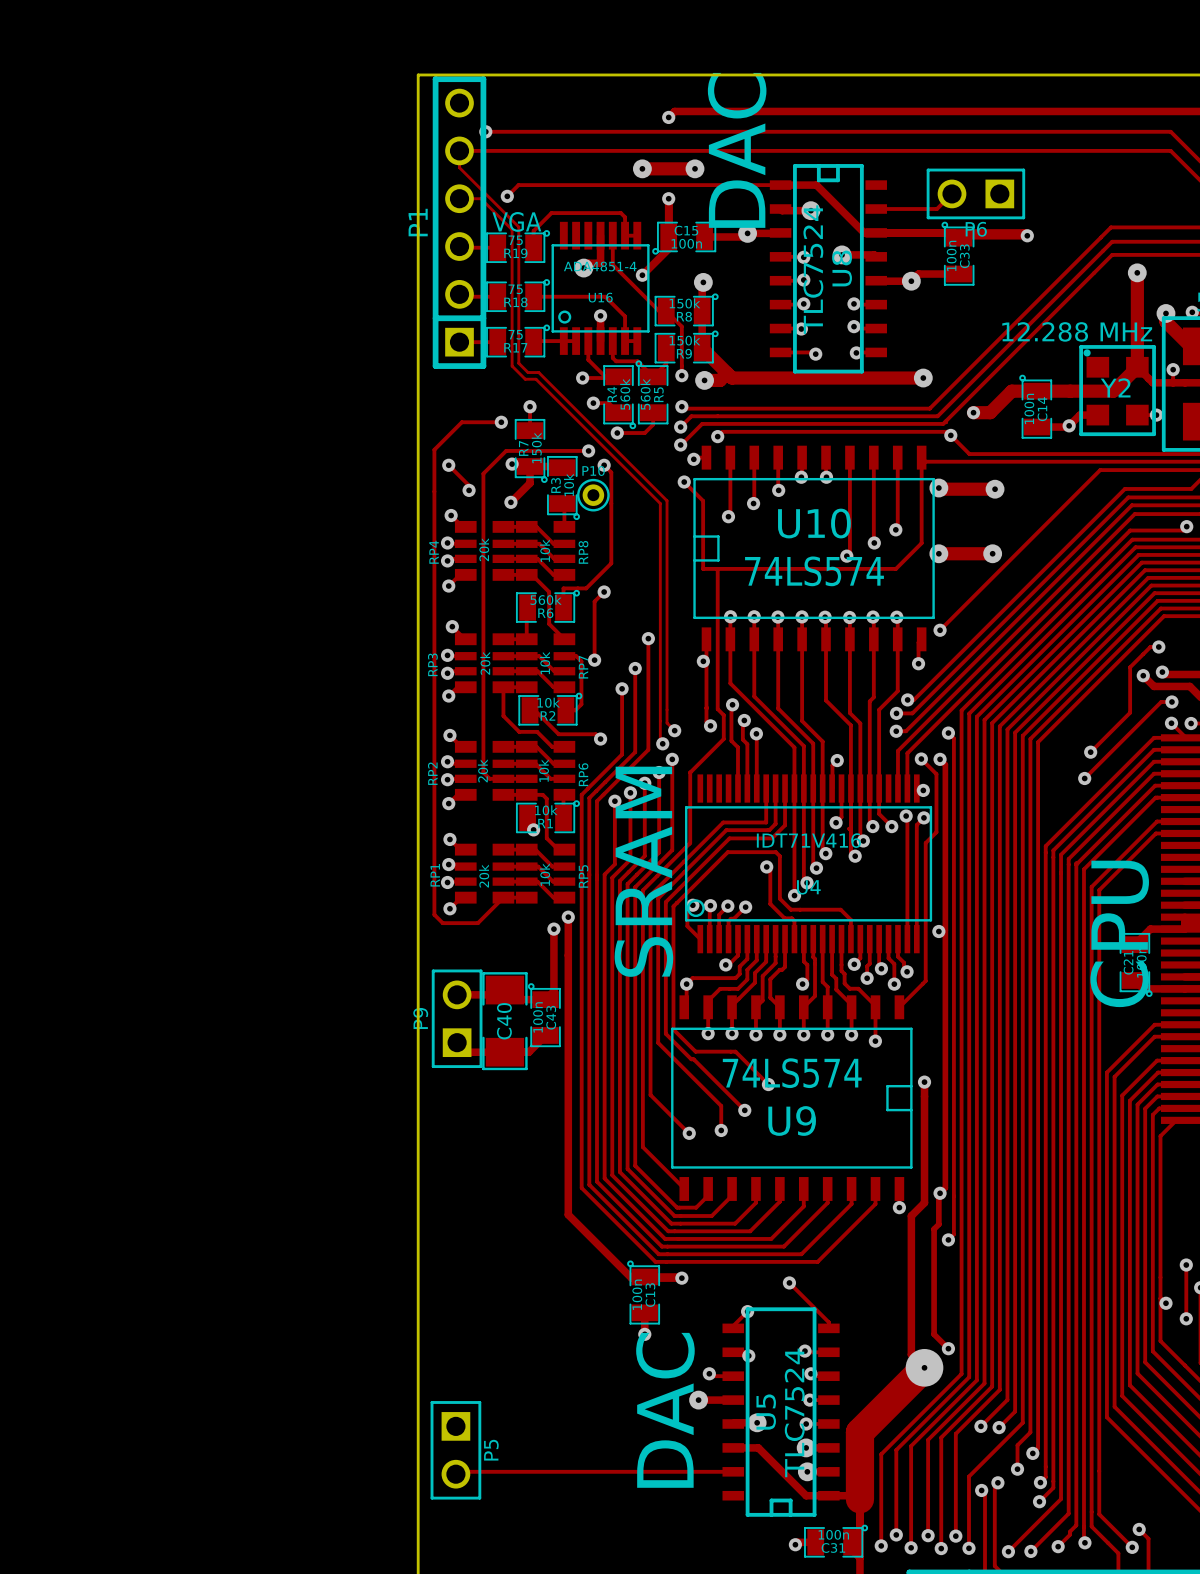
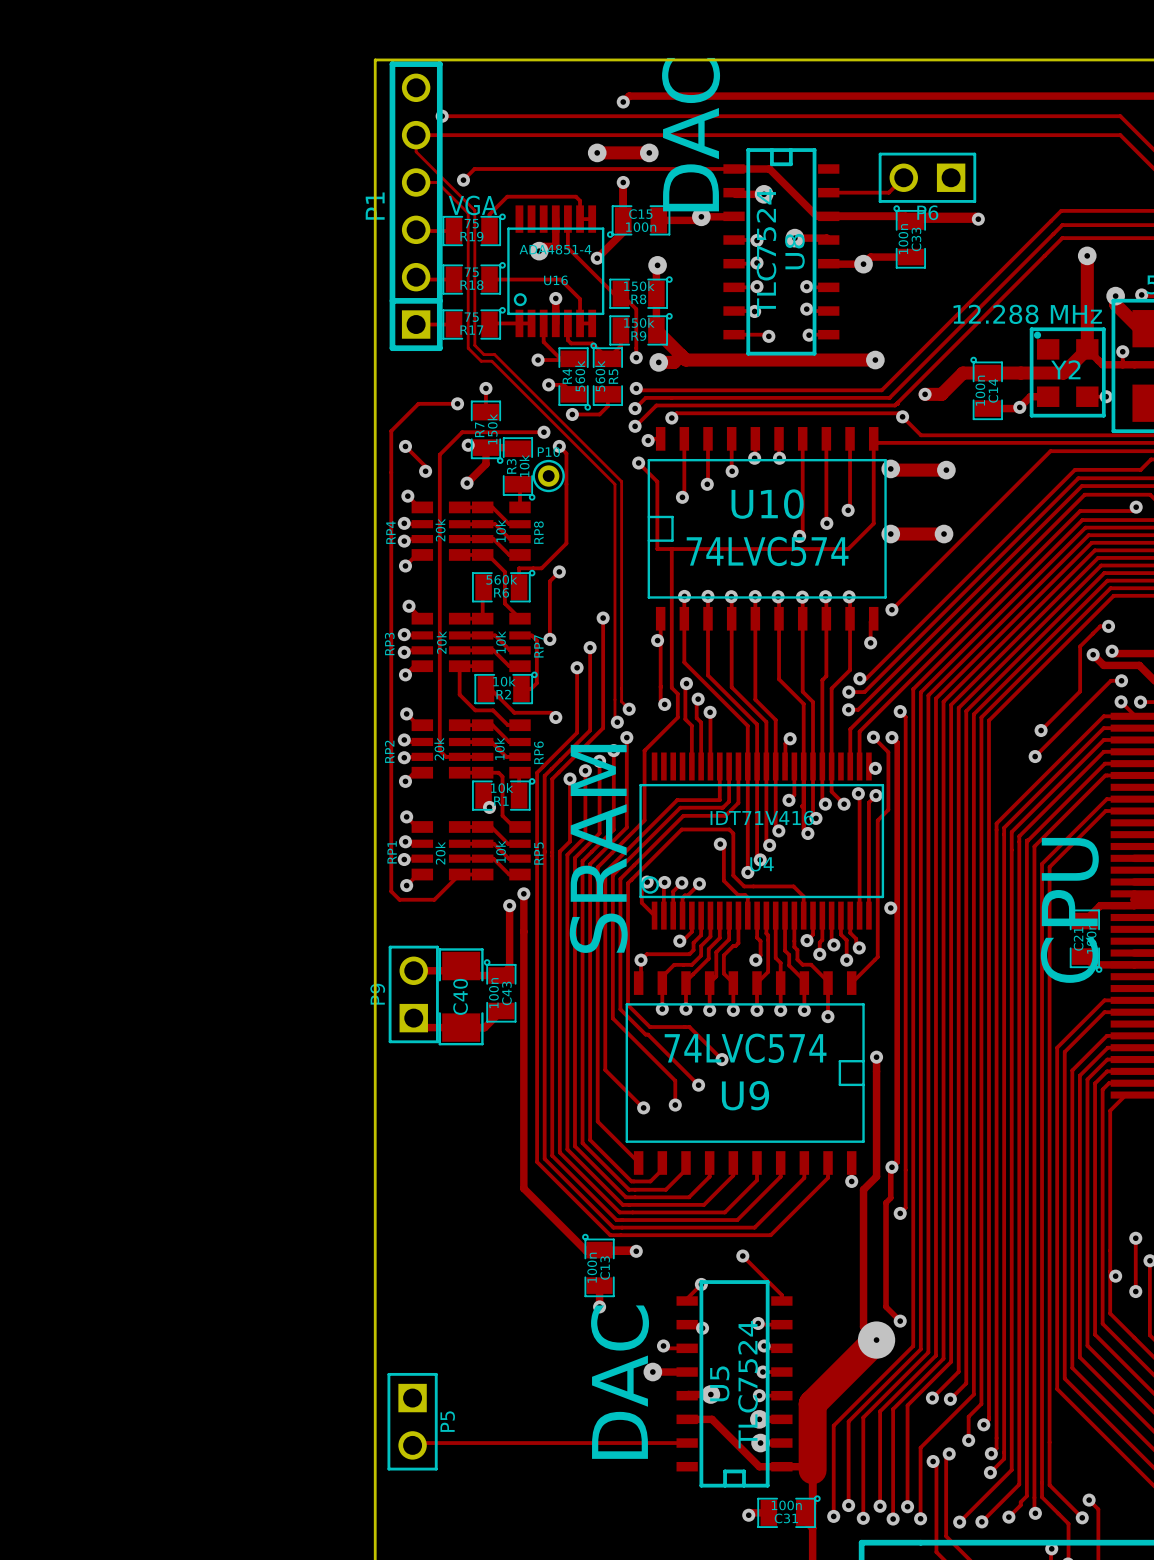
U10 value: 74LS574 (814, 571) -> 74LVC574 (767, 551)
U9 value: 74LS574 (792, 1073) -> 74LVC574 (745, 1048)

